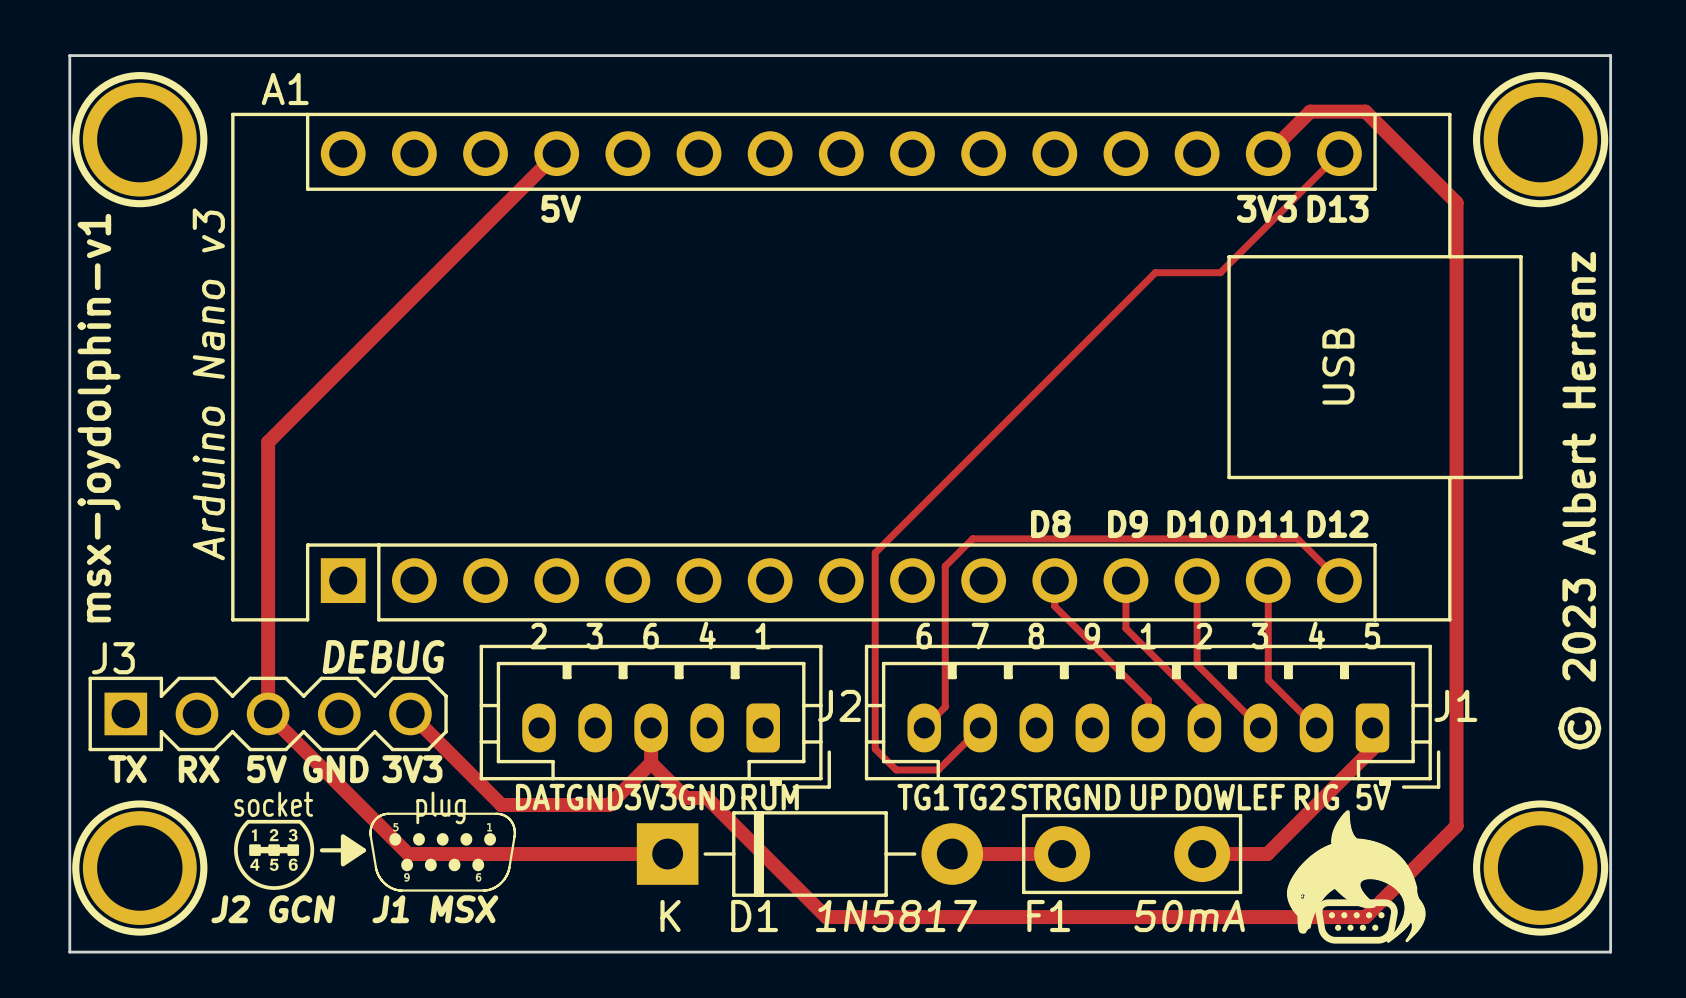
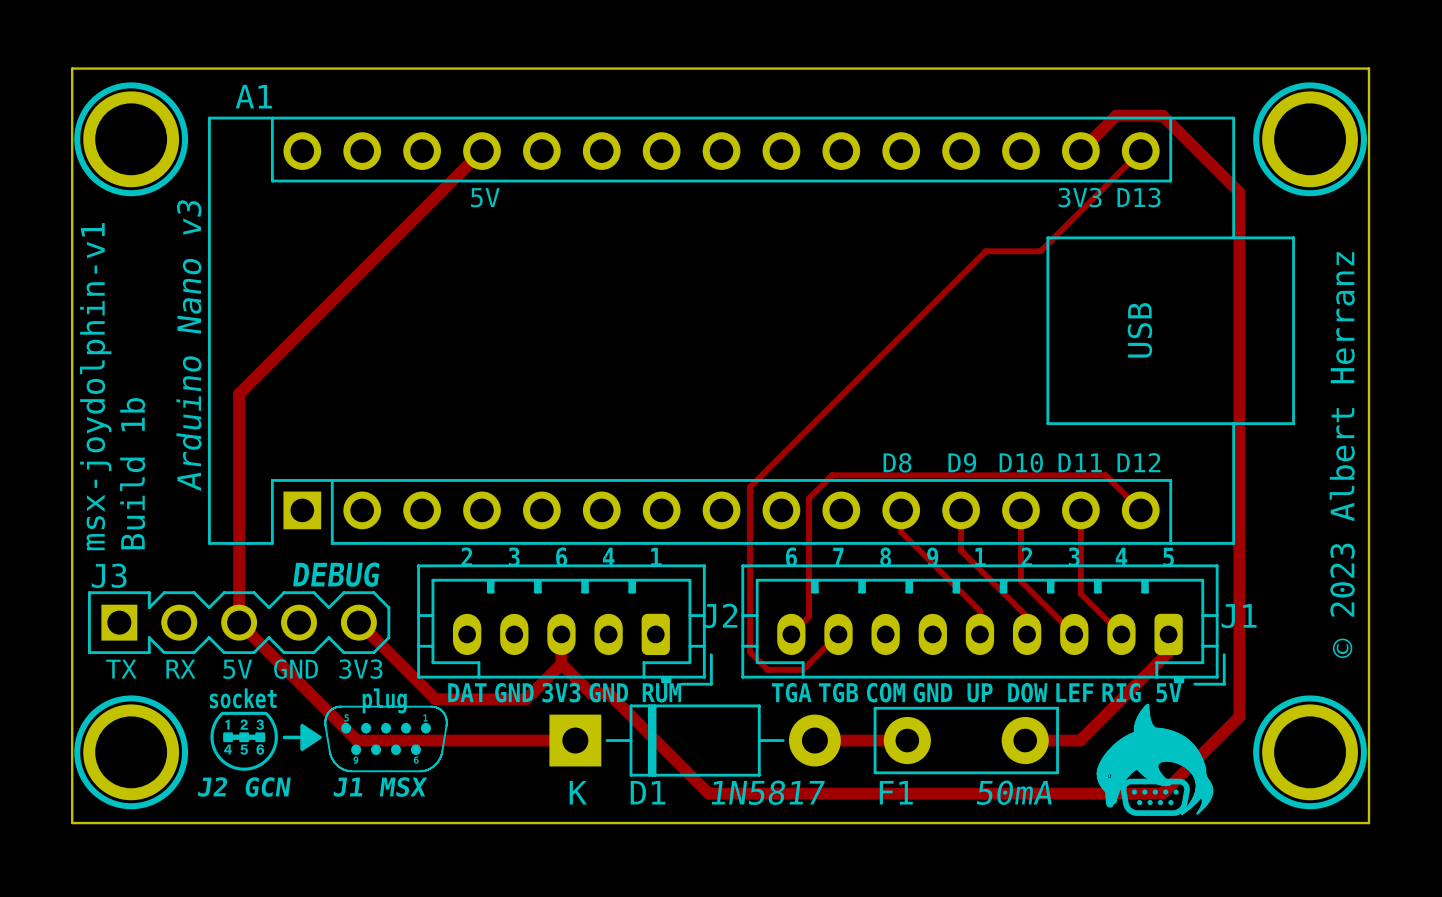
text: none -> Build 1b (132, 473)
text: TG1 (923, 797) -> TGA (791, 692)
text: TG2 (979, 797) -> TGB (838, 692)
text: STR (1036, 797) -> COM (886, 692)

